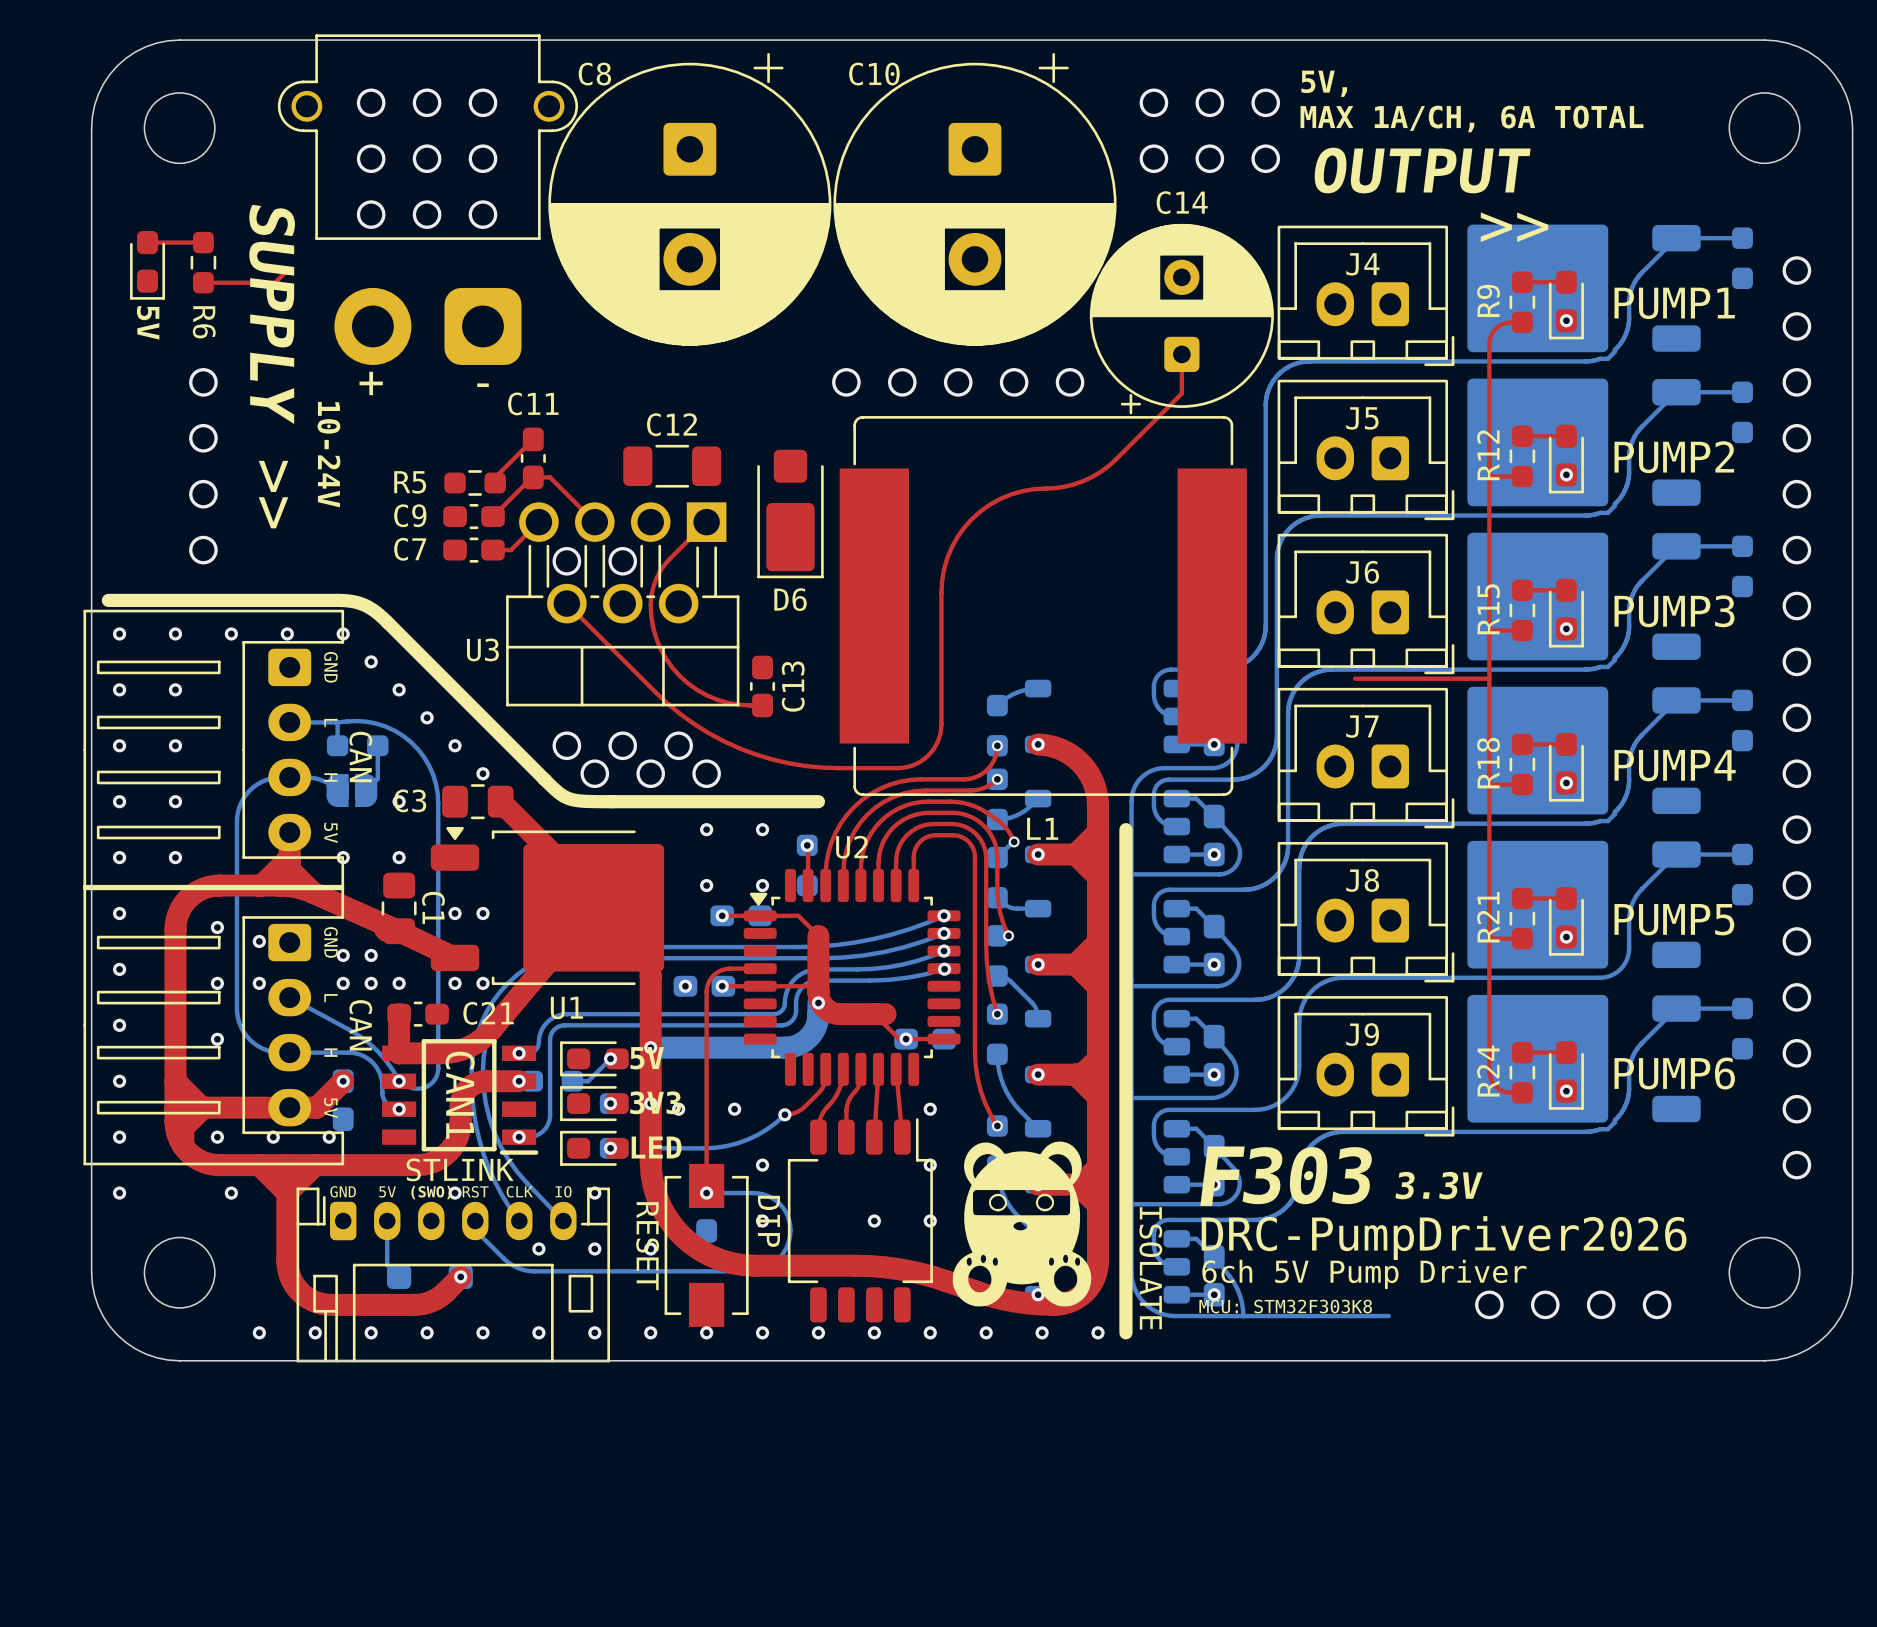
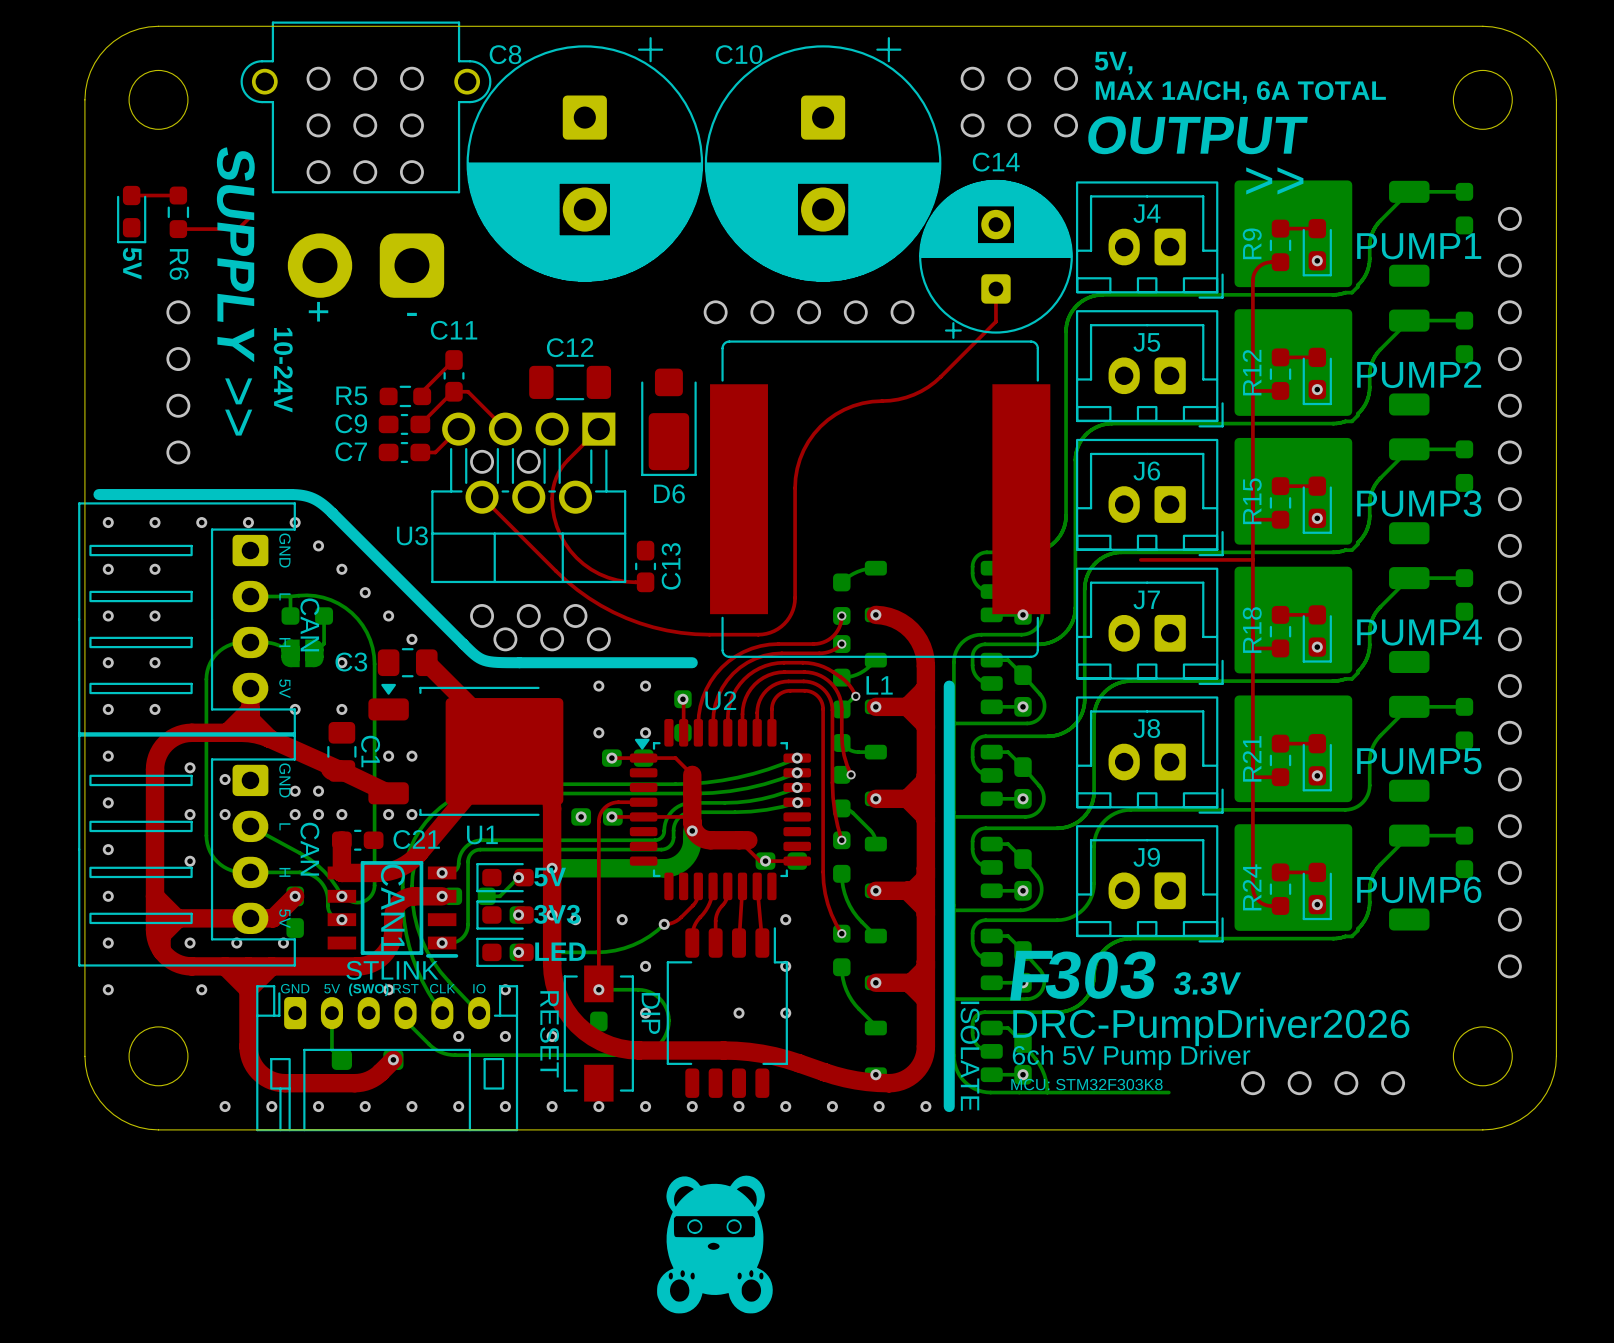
drawing position: (1022, 1223) -> (714, 1244)

